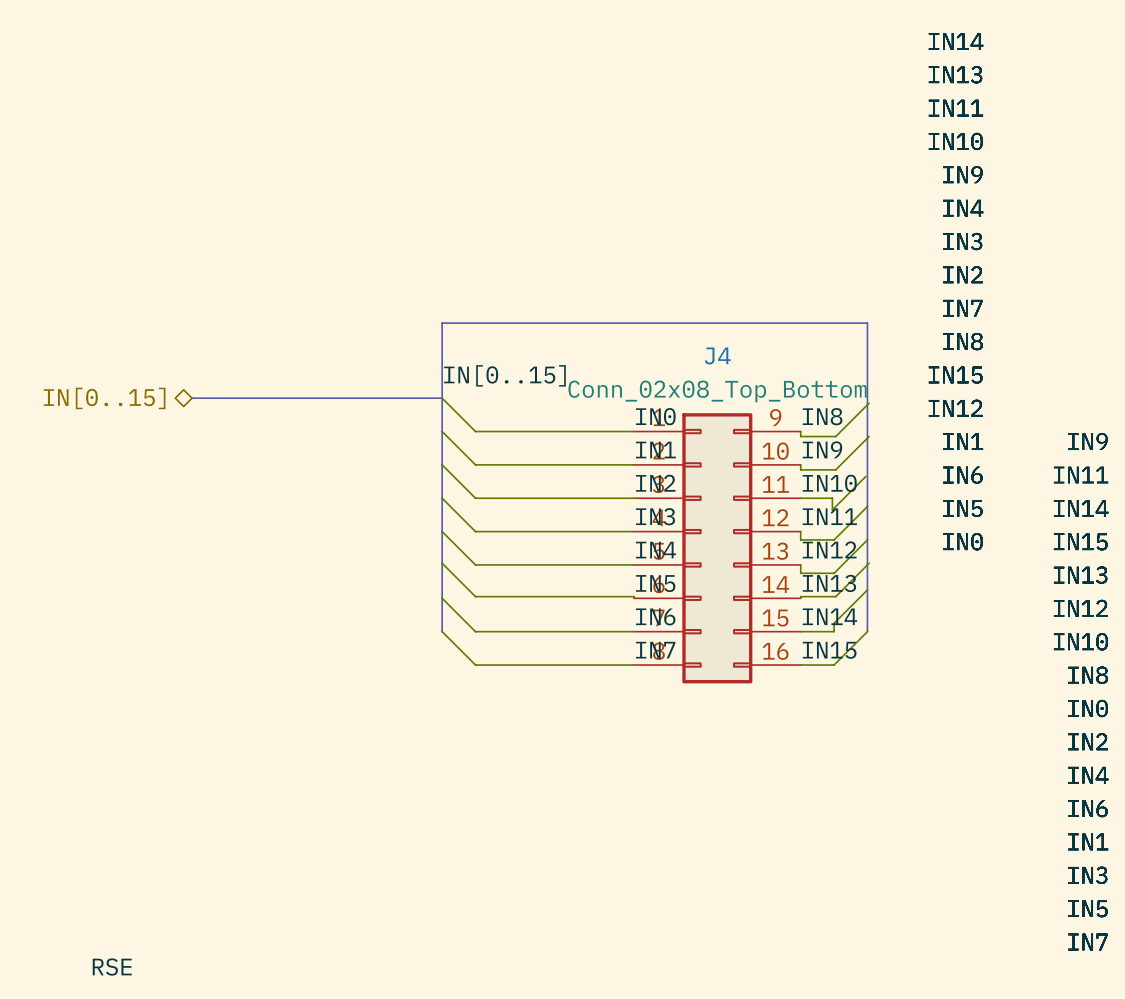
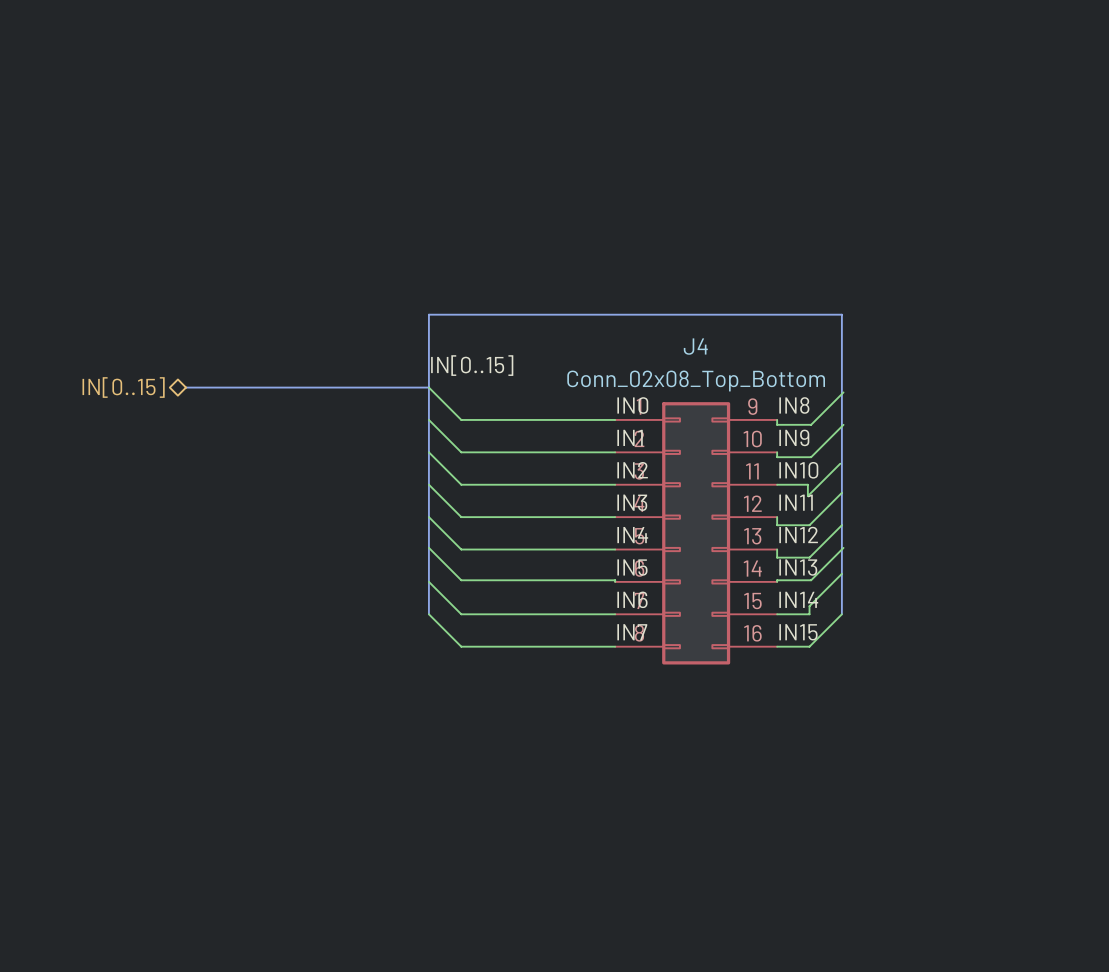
label: IN14 (956, 41) -> none
label: IN13 (955, 74) -> none
label: IN11 (955, 108) -> none
label: IN10 (955, 141) -> none
label: IN9 (962, 174) -> none
label: IN4 (963, 208) -> none
label: IN3 (962, 241) -> none
label: IN2 (962, 274) -> none
label: IN7 (962, 308) -> none
label: IN8 (963, 341) -> none
label: IN15 (955, 375) -> none
label: IN12 (955, 408) -> none
label: IN1 (963, 441) -> none
label: IN9 (1088, 441) -> none
label: IN6 (962, 475) -> none
label: IN11 (1081, 475) -> none
label: IN5 (962, 508) -> none
label: IN14 (1081, 508) -> none
label: IN0 (963, 541) -> none
label: IN15 (1080, 541) -> none
label: IN13 (1080, 575) -> none
label: IN12 (1080, 608) -> none
label: IN10 (1080, 641) -> none
label: IN8 (1088, 675) -> none
label: IN0 (1088, 708) -> none
label: IN2 (1088, 741) -> none
label: IN4 (1088, 775) -> none
label: IN6 (1088, 808) -> none
label: IN1 (1088, 841) -> none
label: IN3 (1087, 875) -> none
label: IN5 (1087, 908) -> none
label: IN7 (1087, 942) -> none
label: RSE (112, 967) -> none

